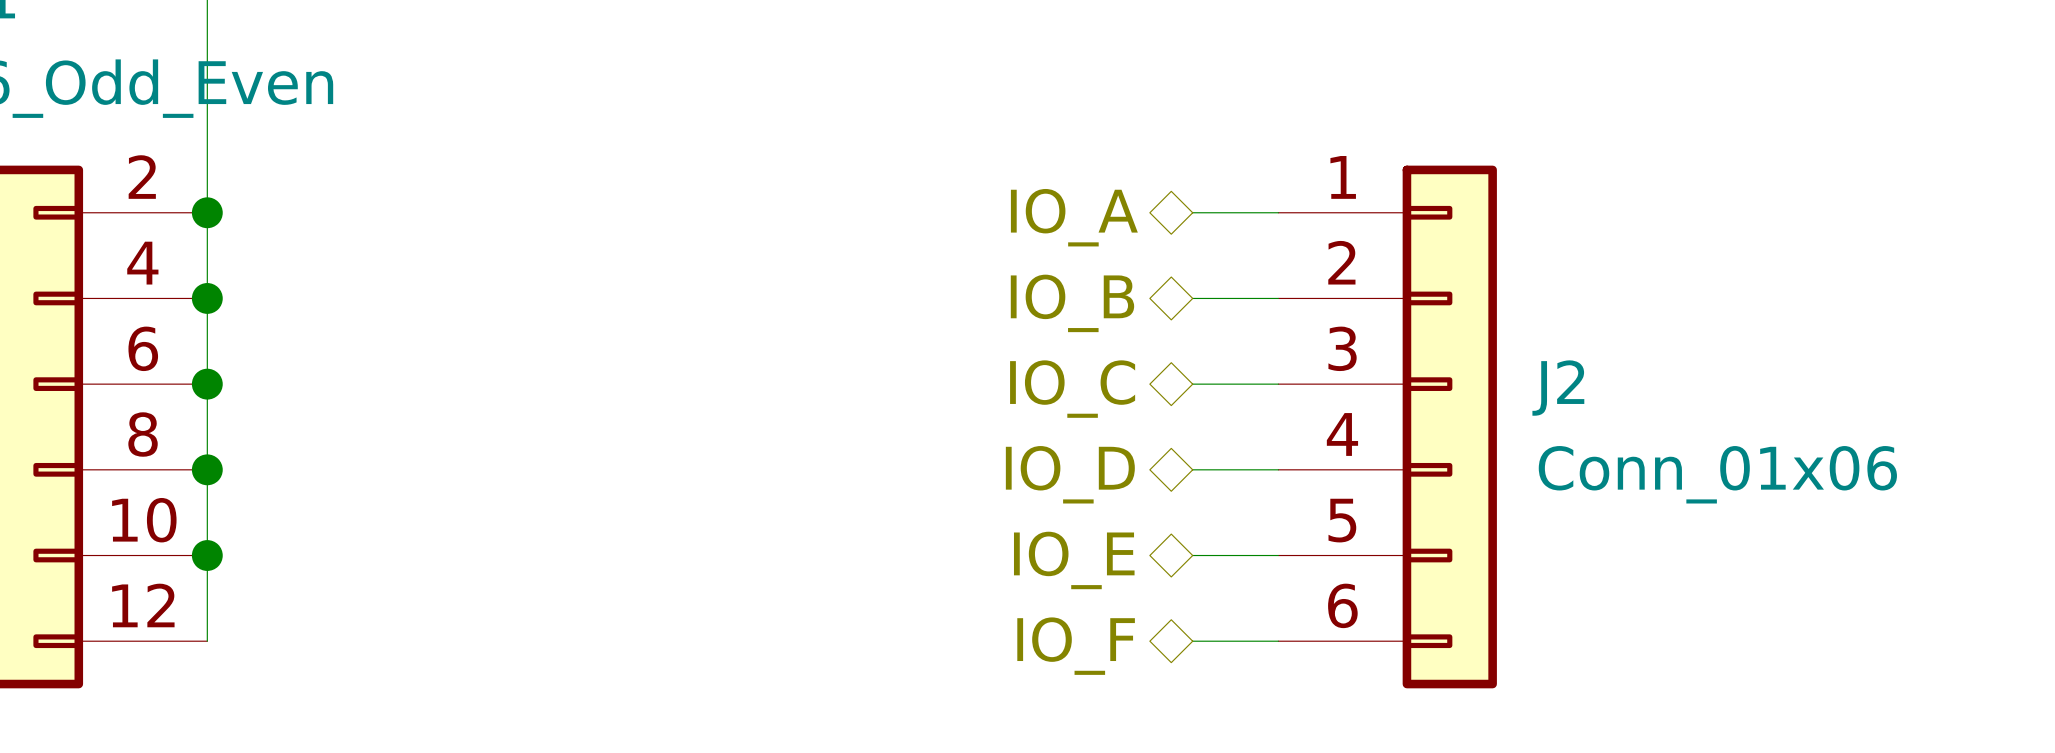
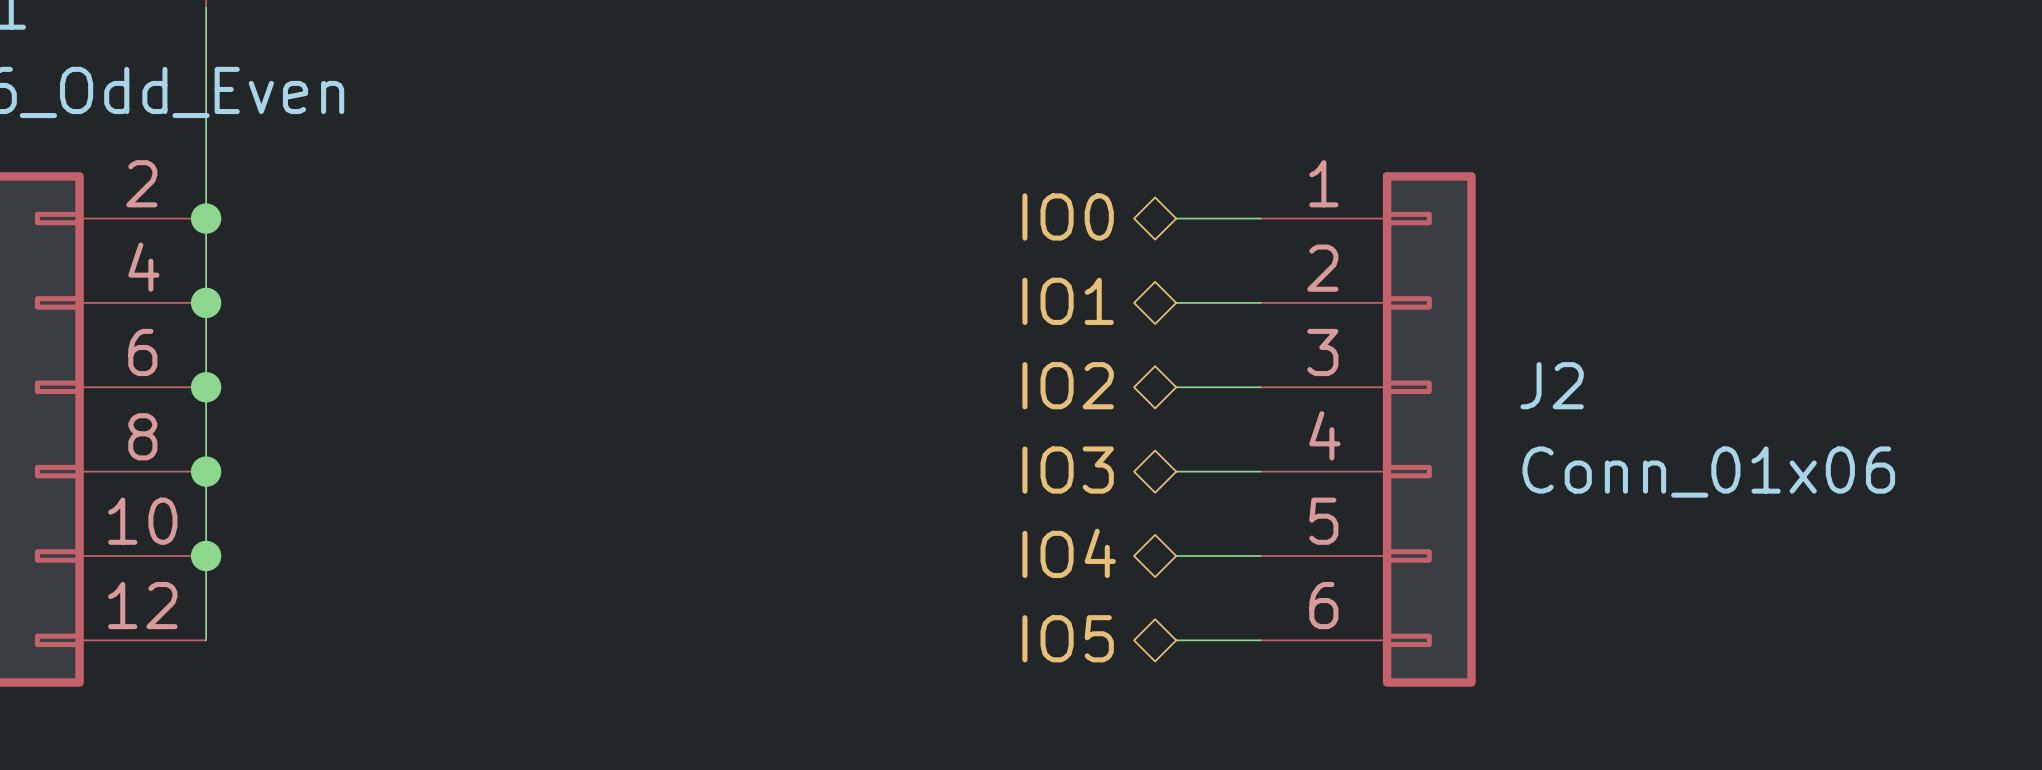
hierarchical label: IO_A (1074, 217) -> IO0 (1068, 216)
hierarchical label: IO_B (1072, 303) -> IO1 (1068, 301)
hierarchical label: IO_C (1072, 389) -> IO2 (1068, 385)
hierarchical label: IO_D (1070, 474) -> IO3 (1068, 470)
hierarchical label: IO_E (1074, 560) -> IO4 (1069, 553)
hierarchical label: IO_F (1076, 646) -> IO5 (1068, 638)

